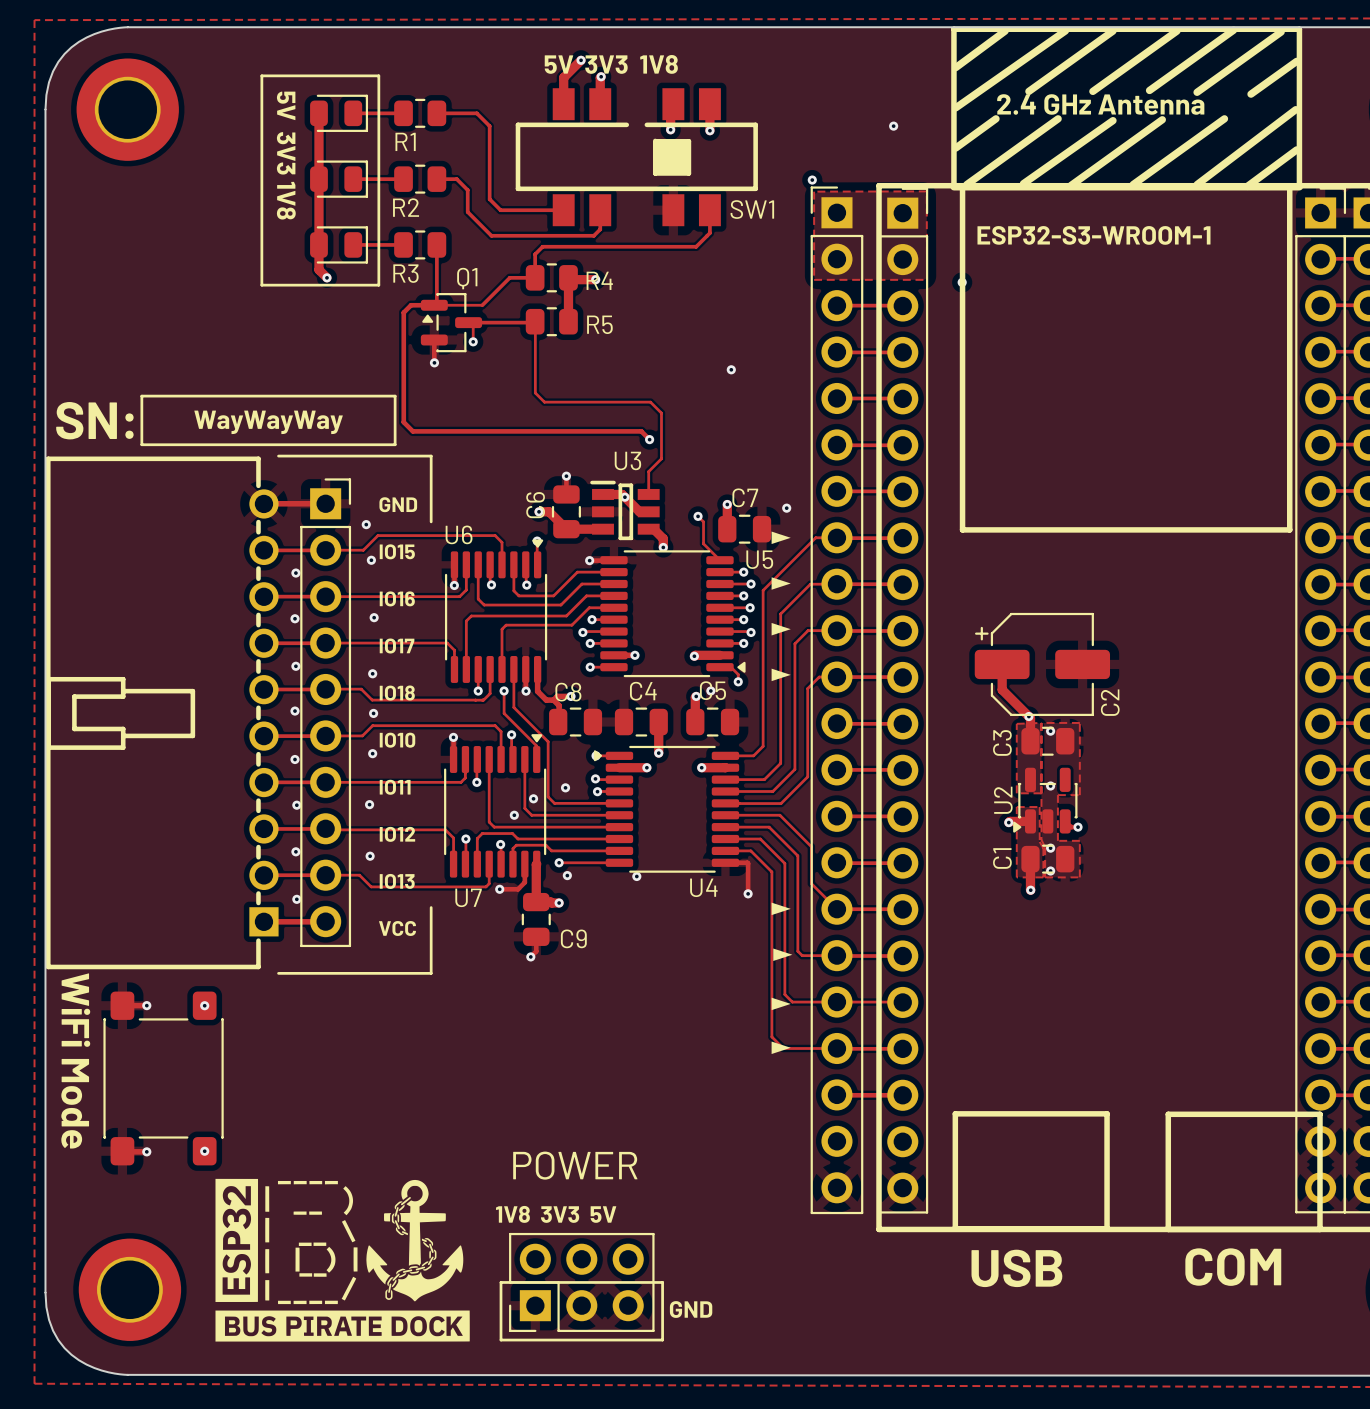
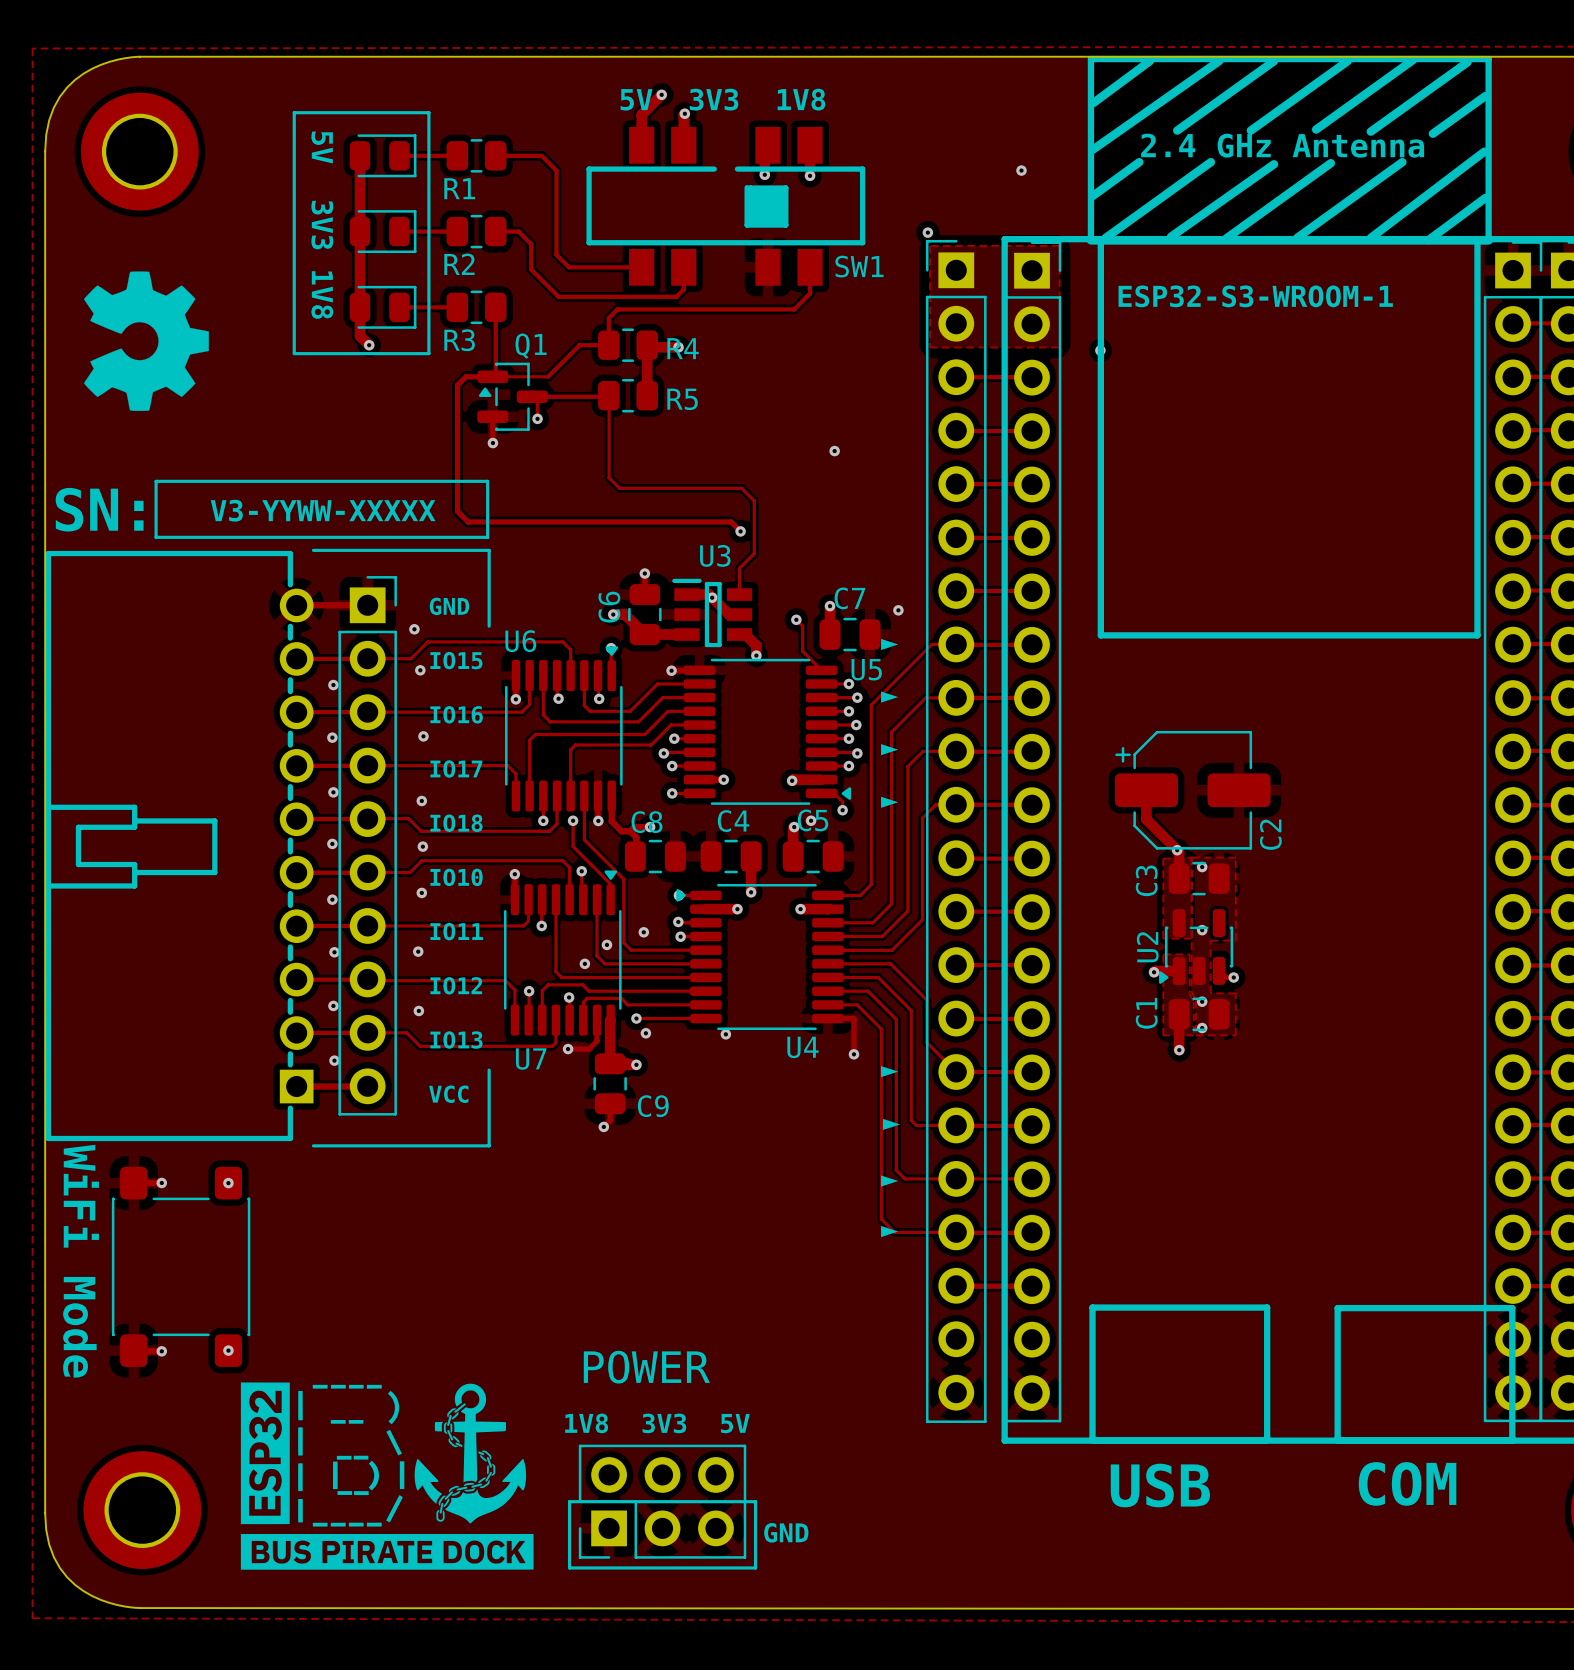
drawing: none -> [84, 271, 209, 411]
line: (395, 396) (395, 444) -> (447, 481) (487, 481) (487, 537) (447, 537)
text: none -> V3-YYWW-XXXXX (323, 510)
text: WayWayWay (268, 422) -> none

